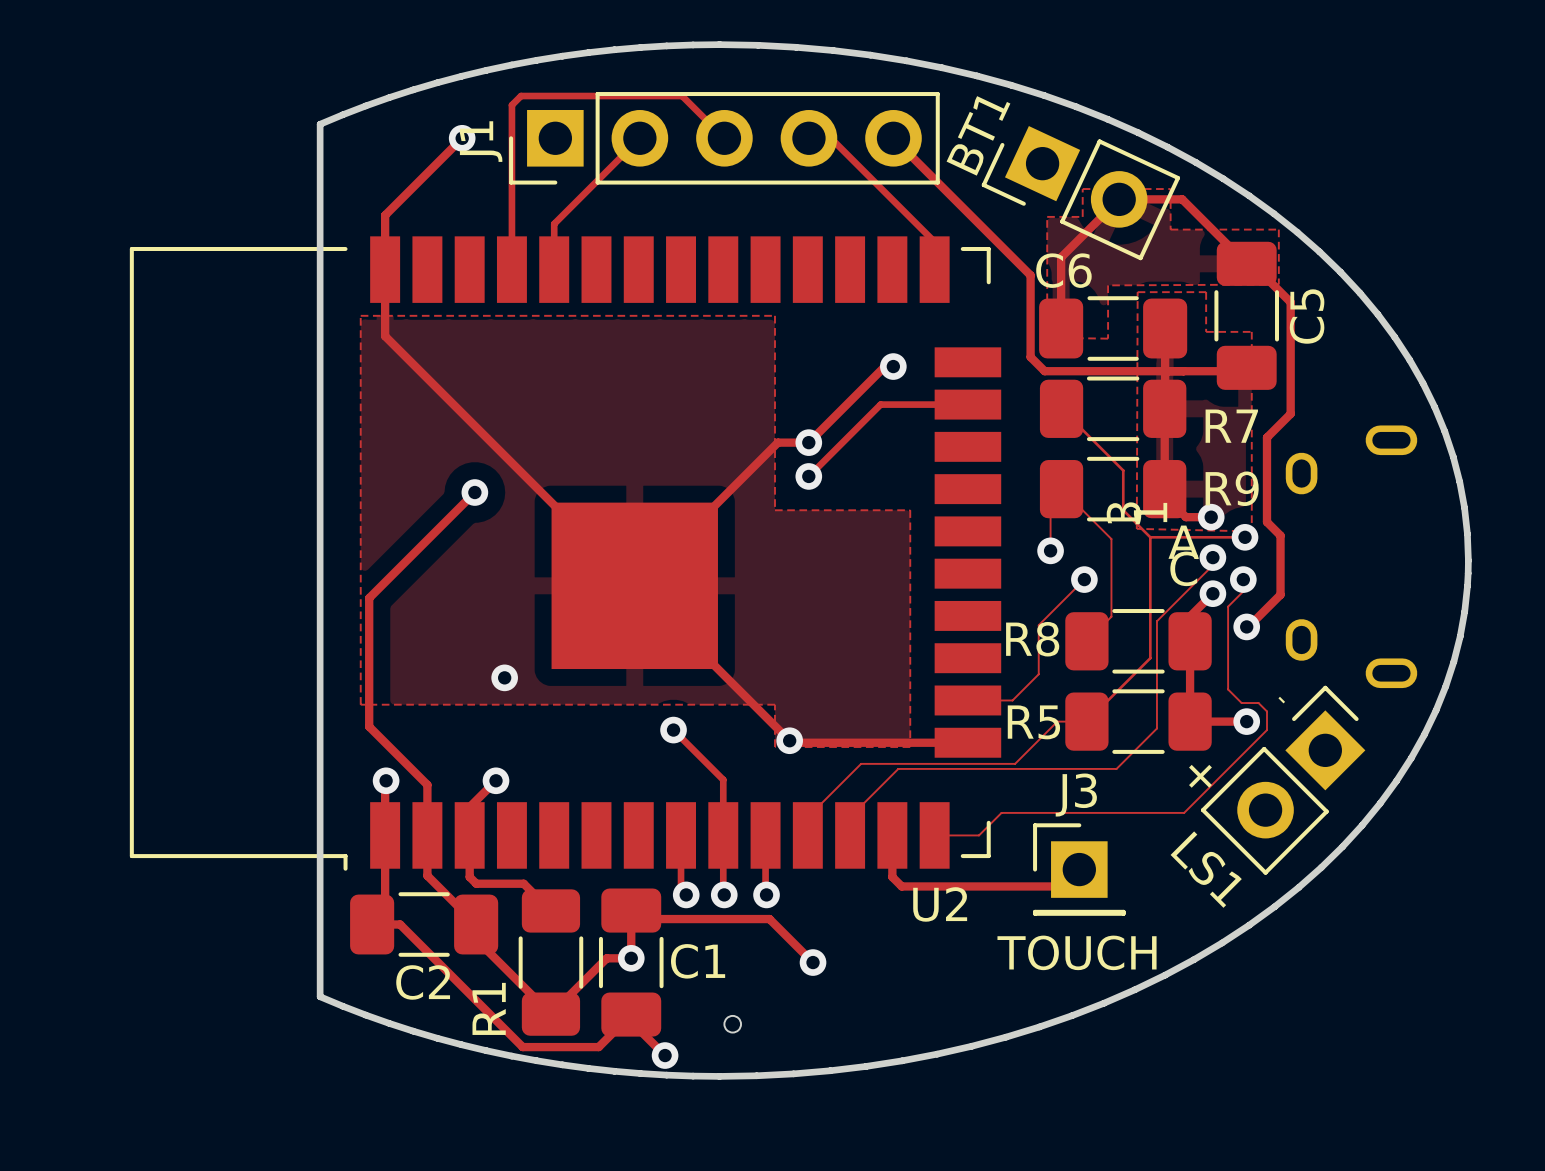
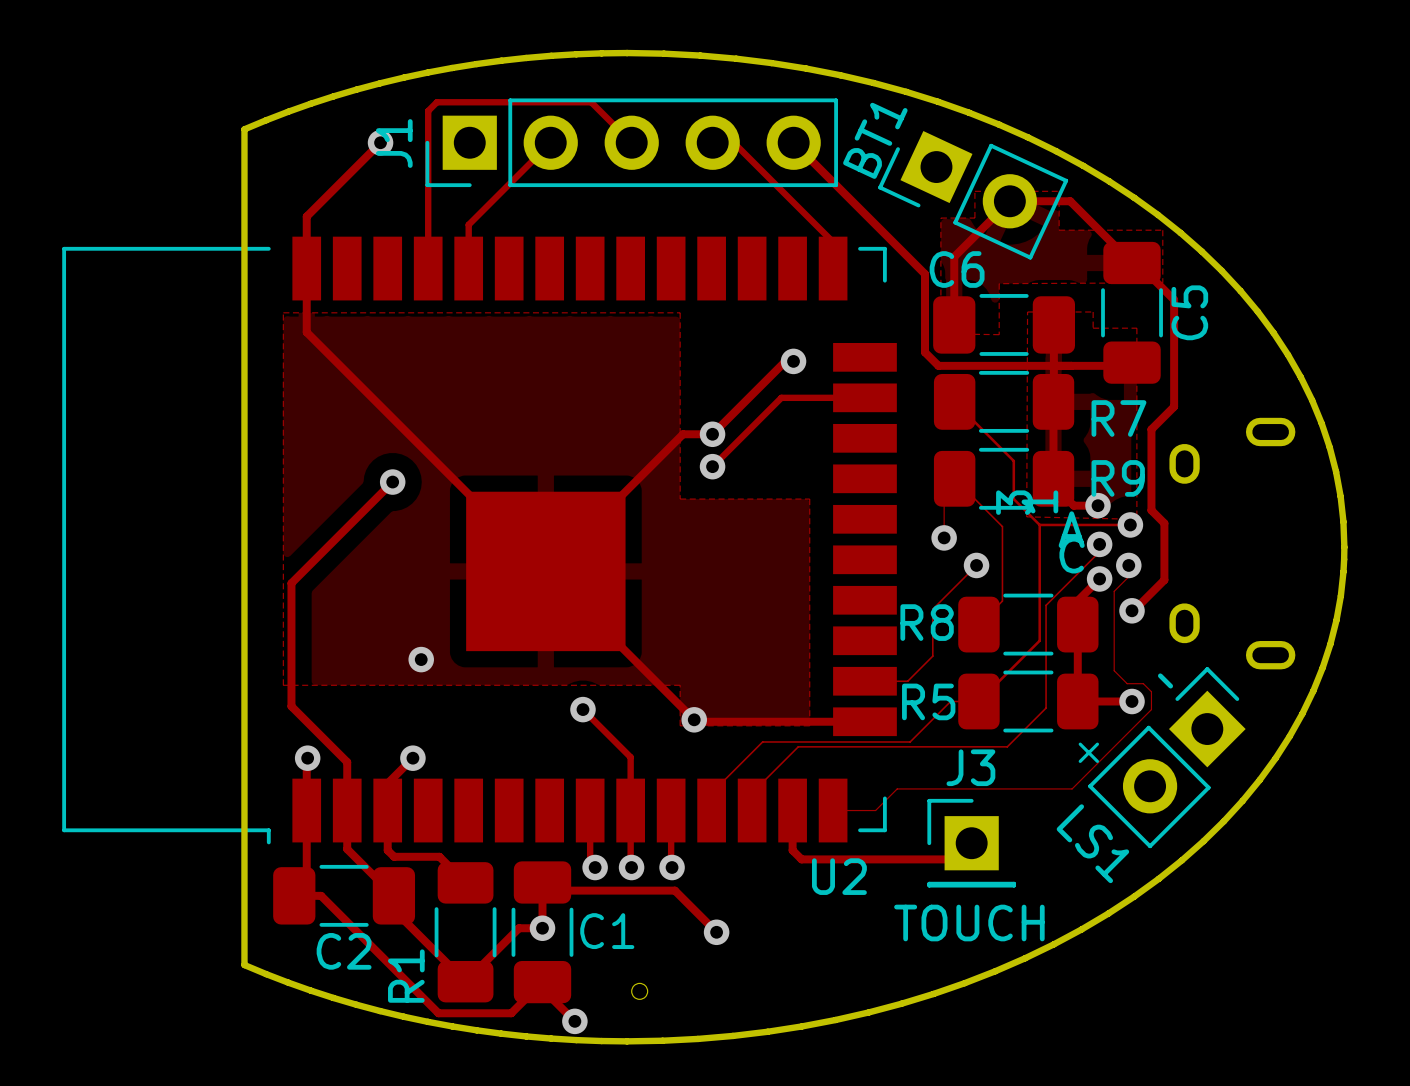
zone outline: (1206, 314) (1206, 292) (1137, 292) (1136, 528) -> (1093, 311) (1027, 311) (1026, 516)

